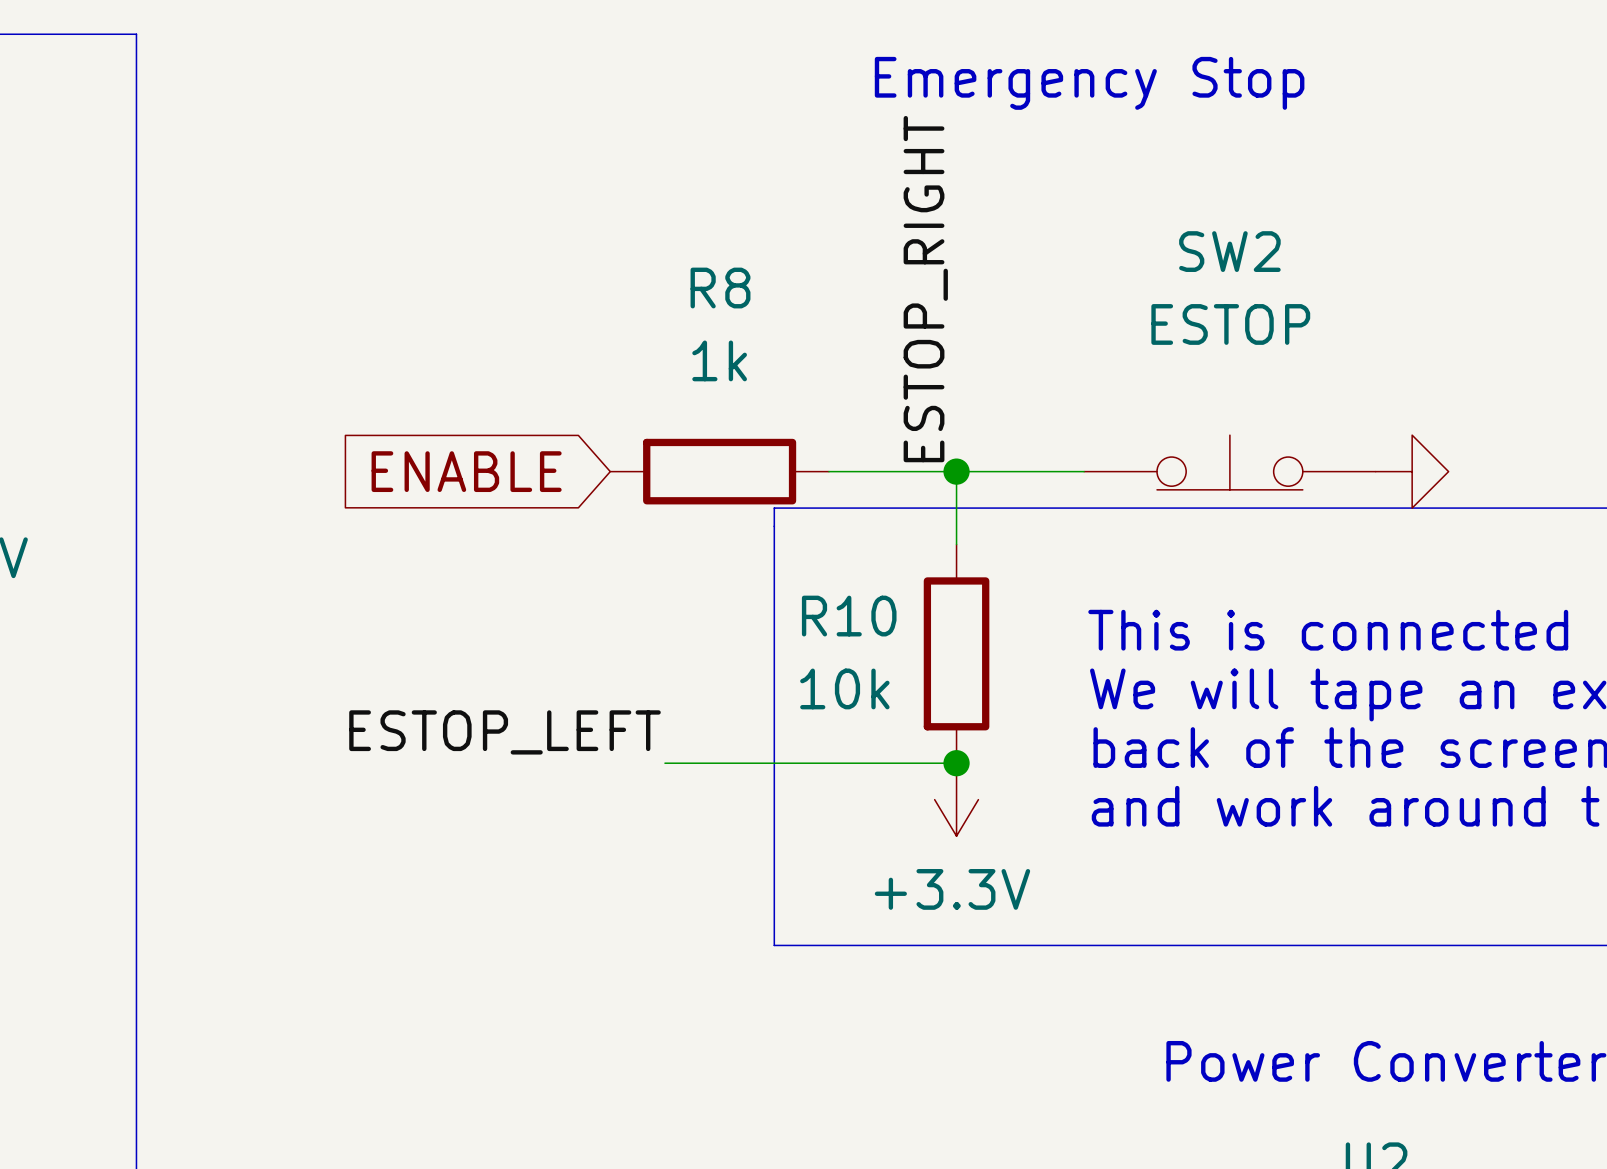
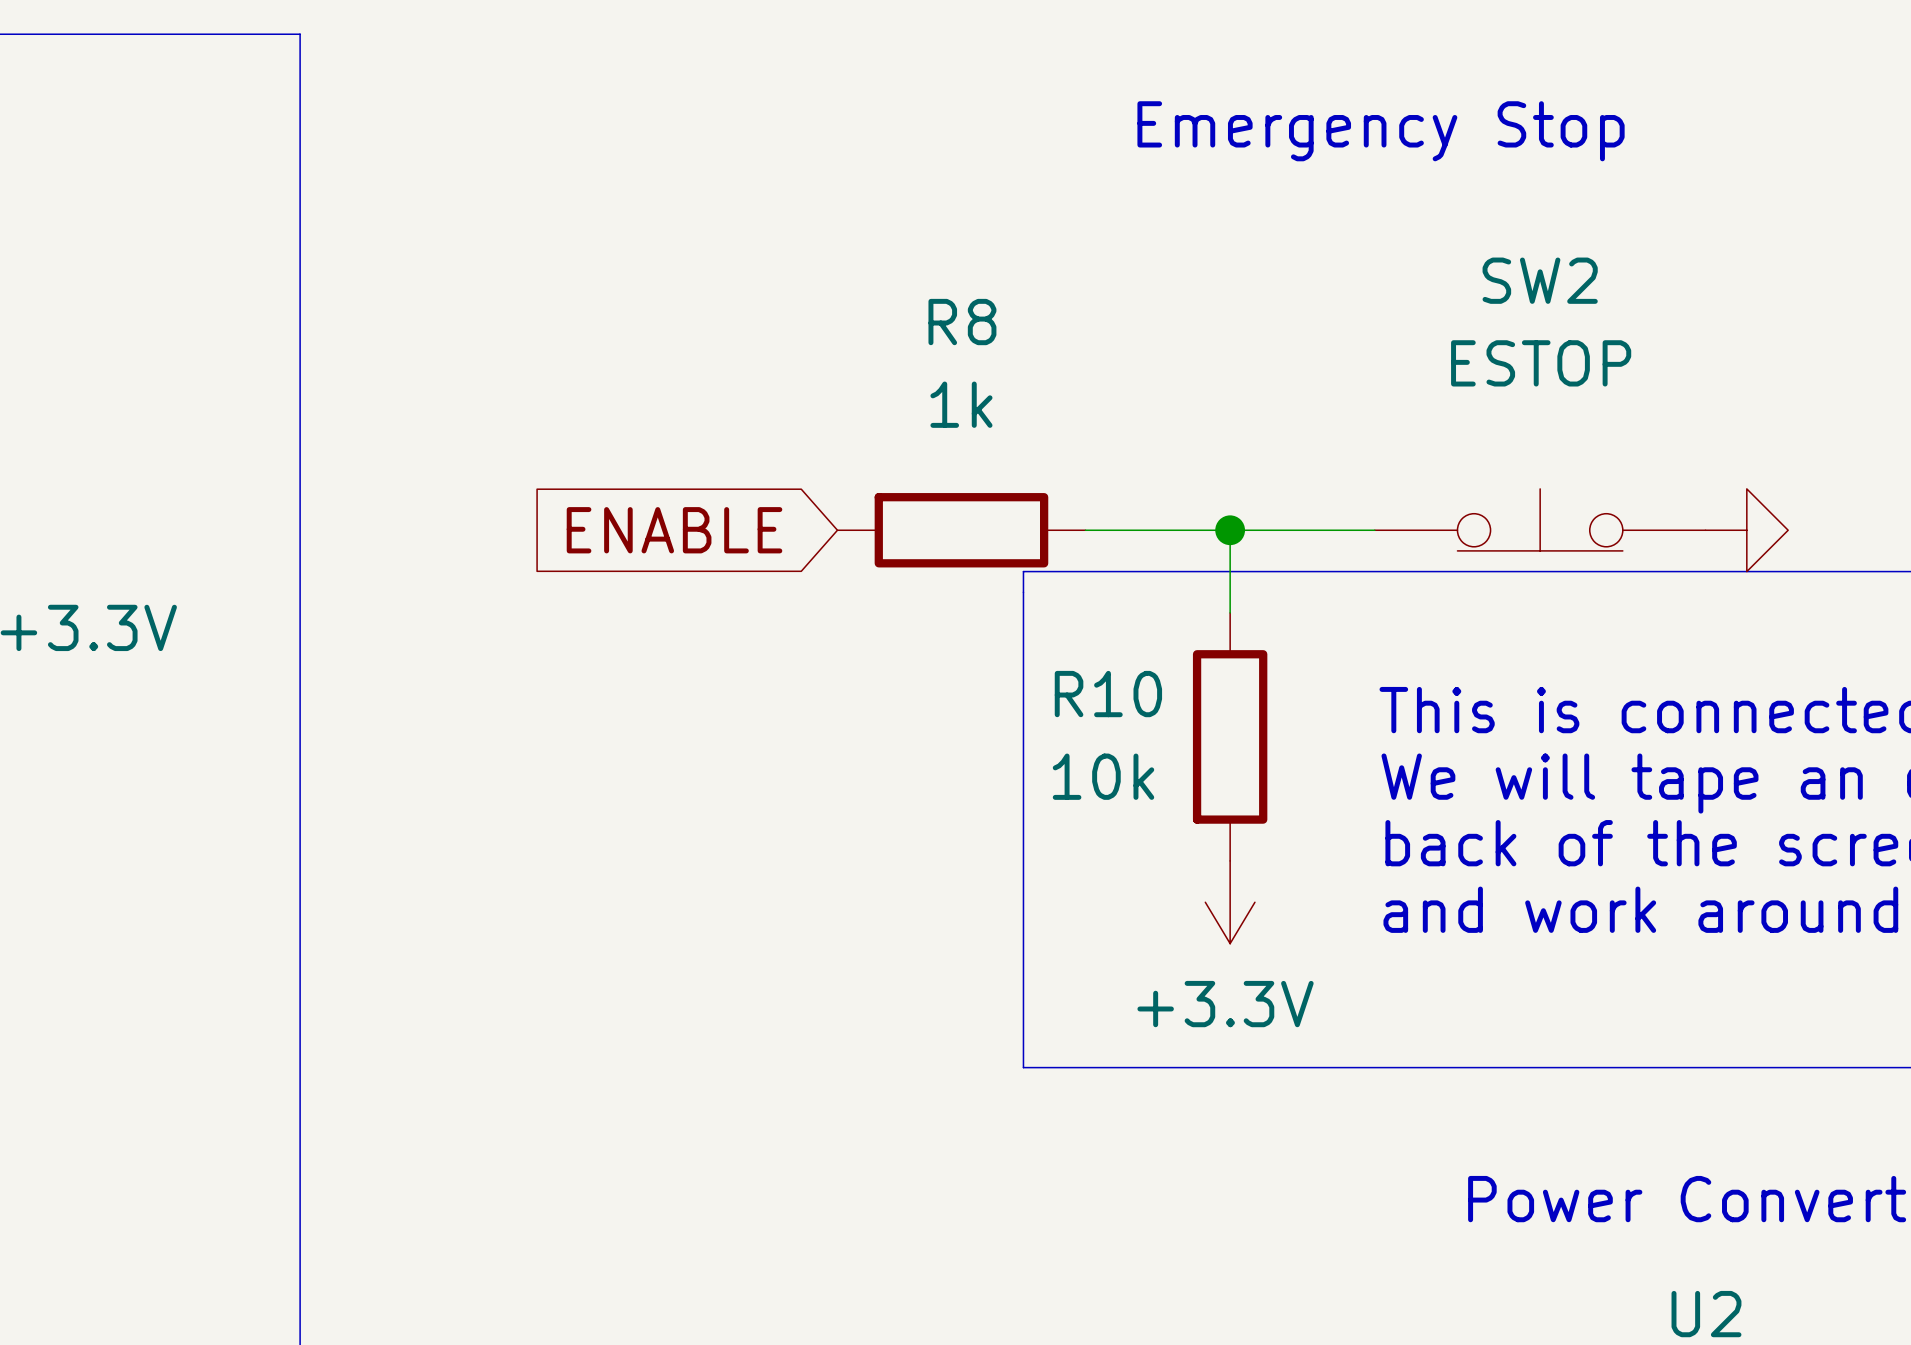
text position: Emergency Stop (1089, 83) -> Emergency Stop (1381, 131)
label: ESTOP_RIGHT (925, 289) -> none
label: ESTOP_LEFT (505, 732) -> none
wire: (664, 763) (956, 763) -> none
junction: (956, 763) -> none

